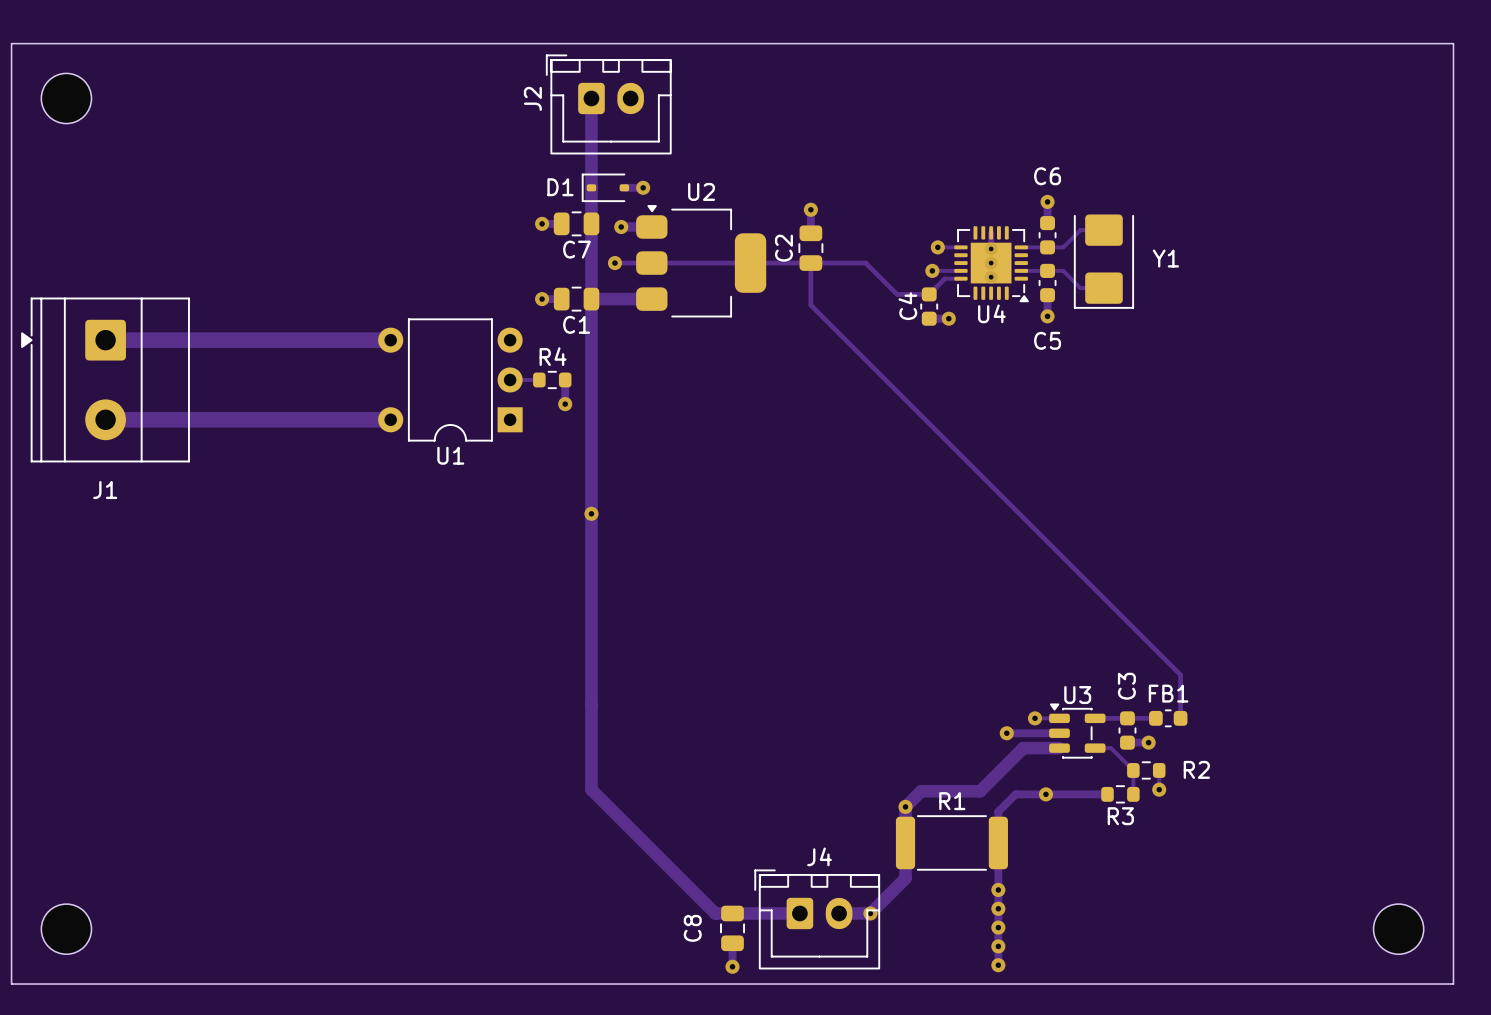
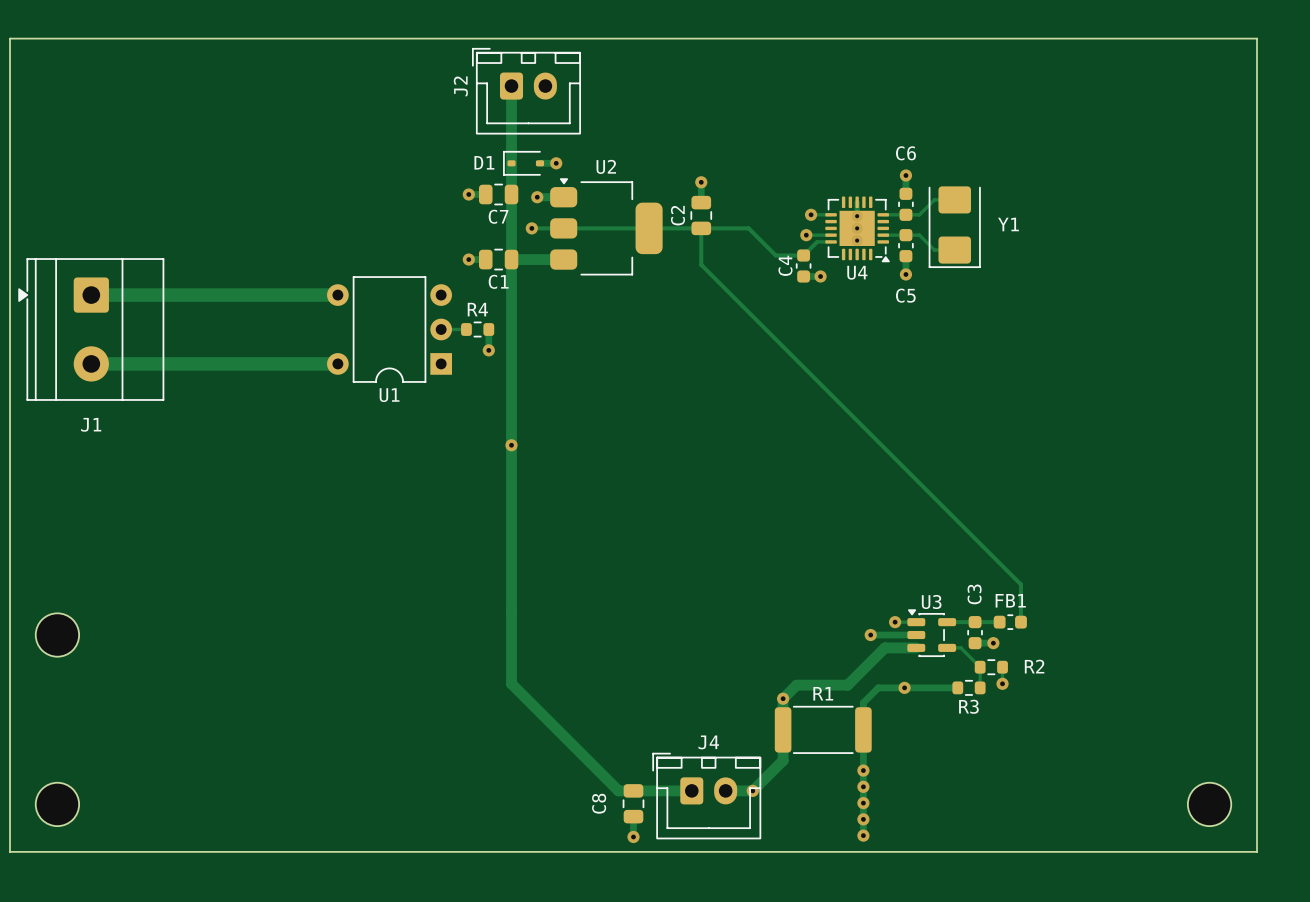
part: (66, 98) -> none
part: none -> (57, 635)

